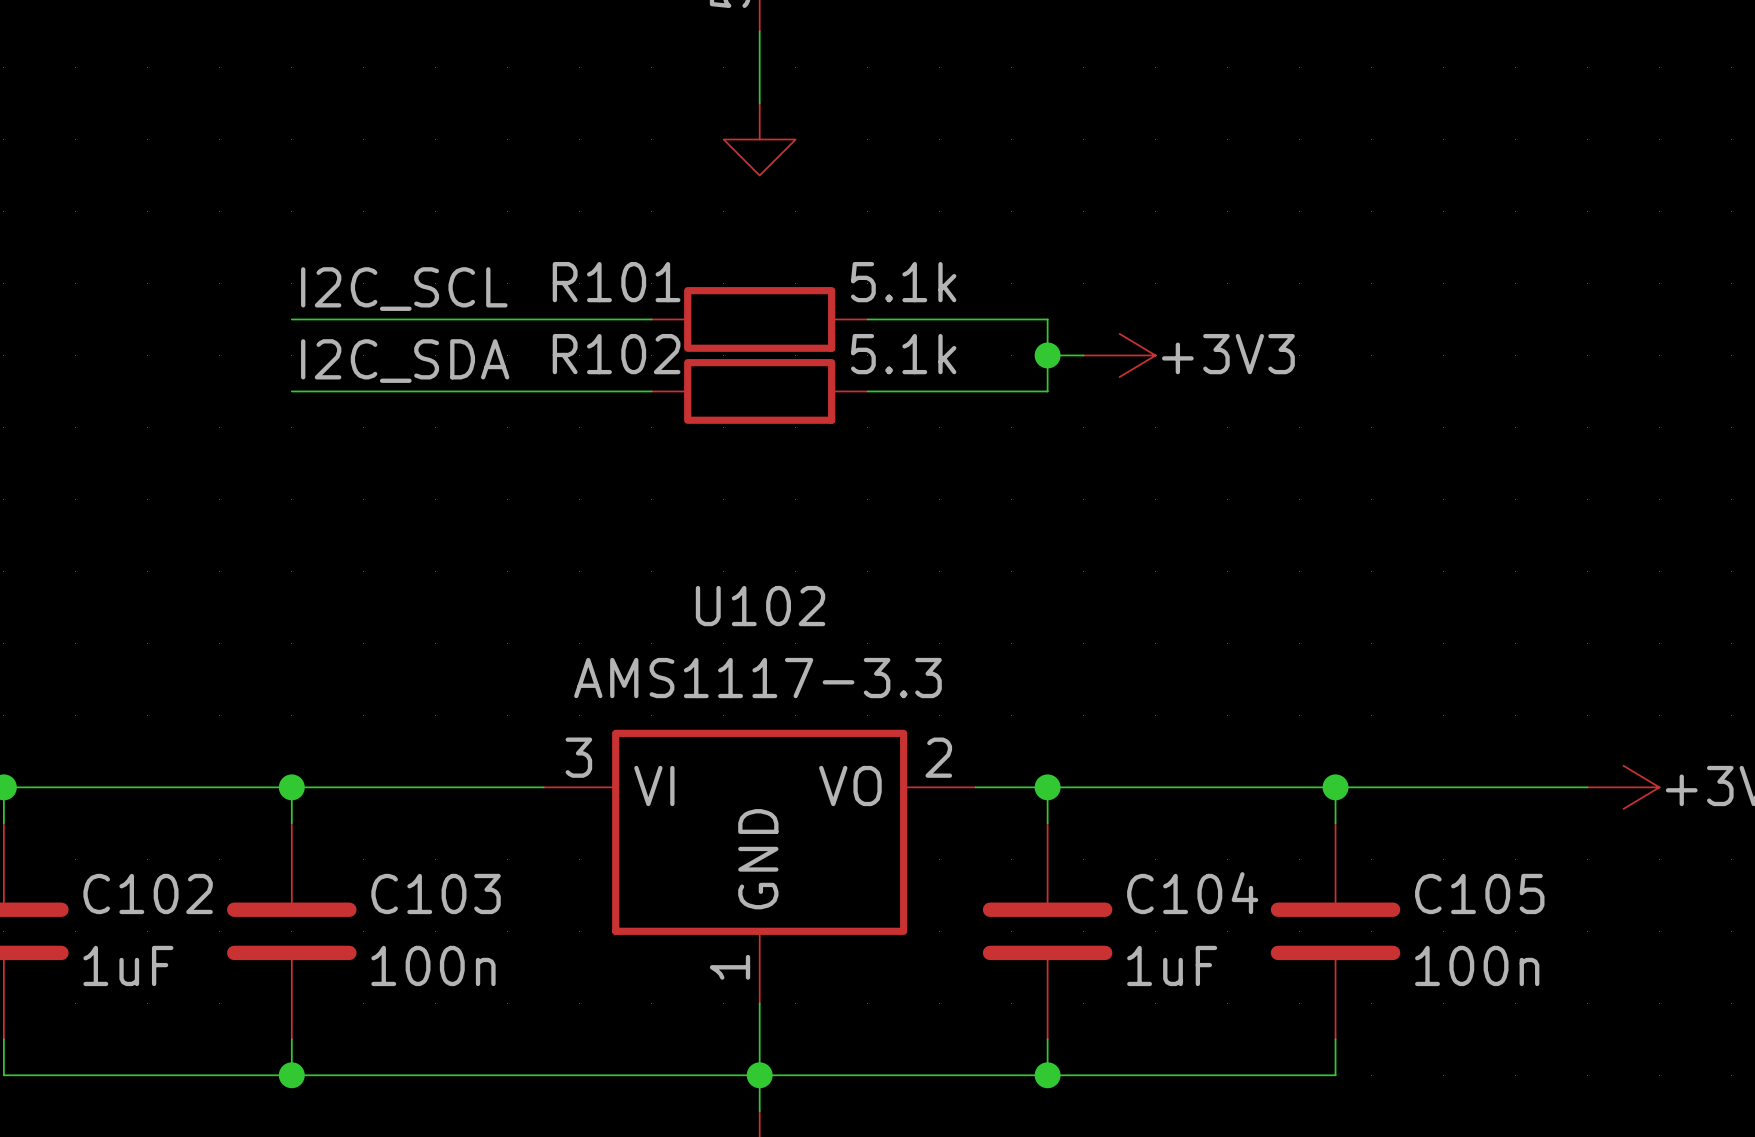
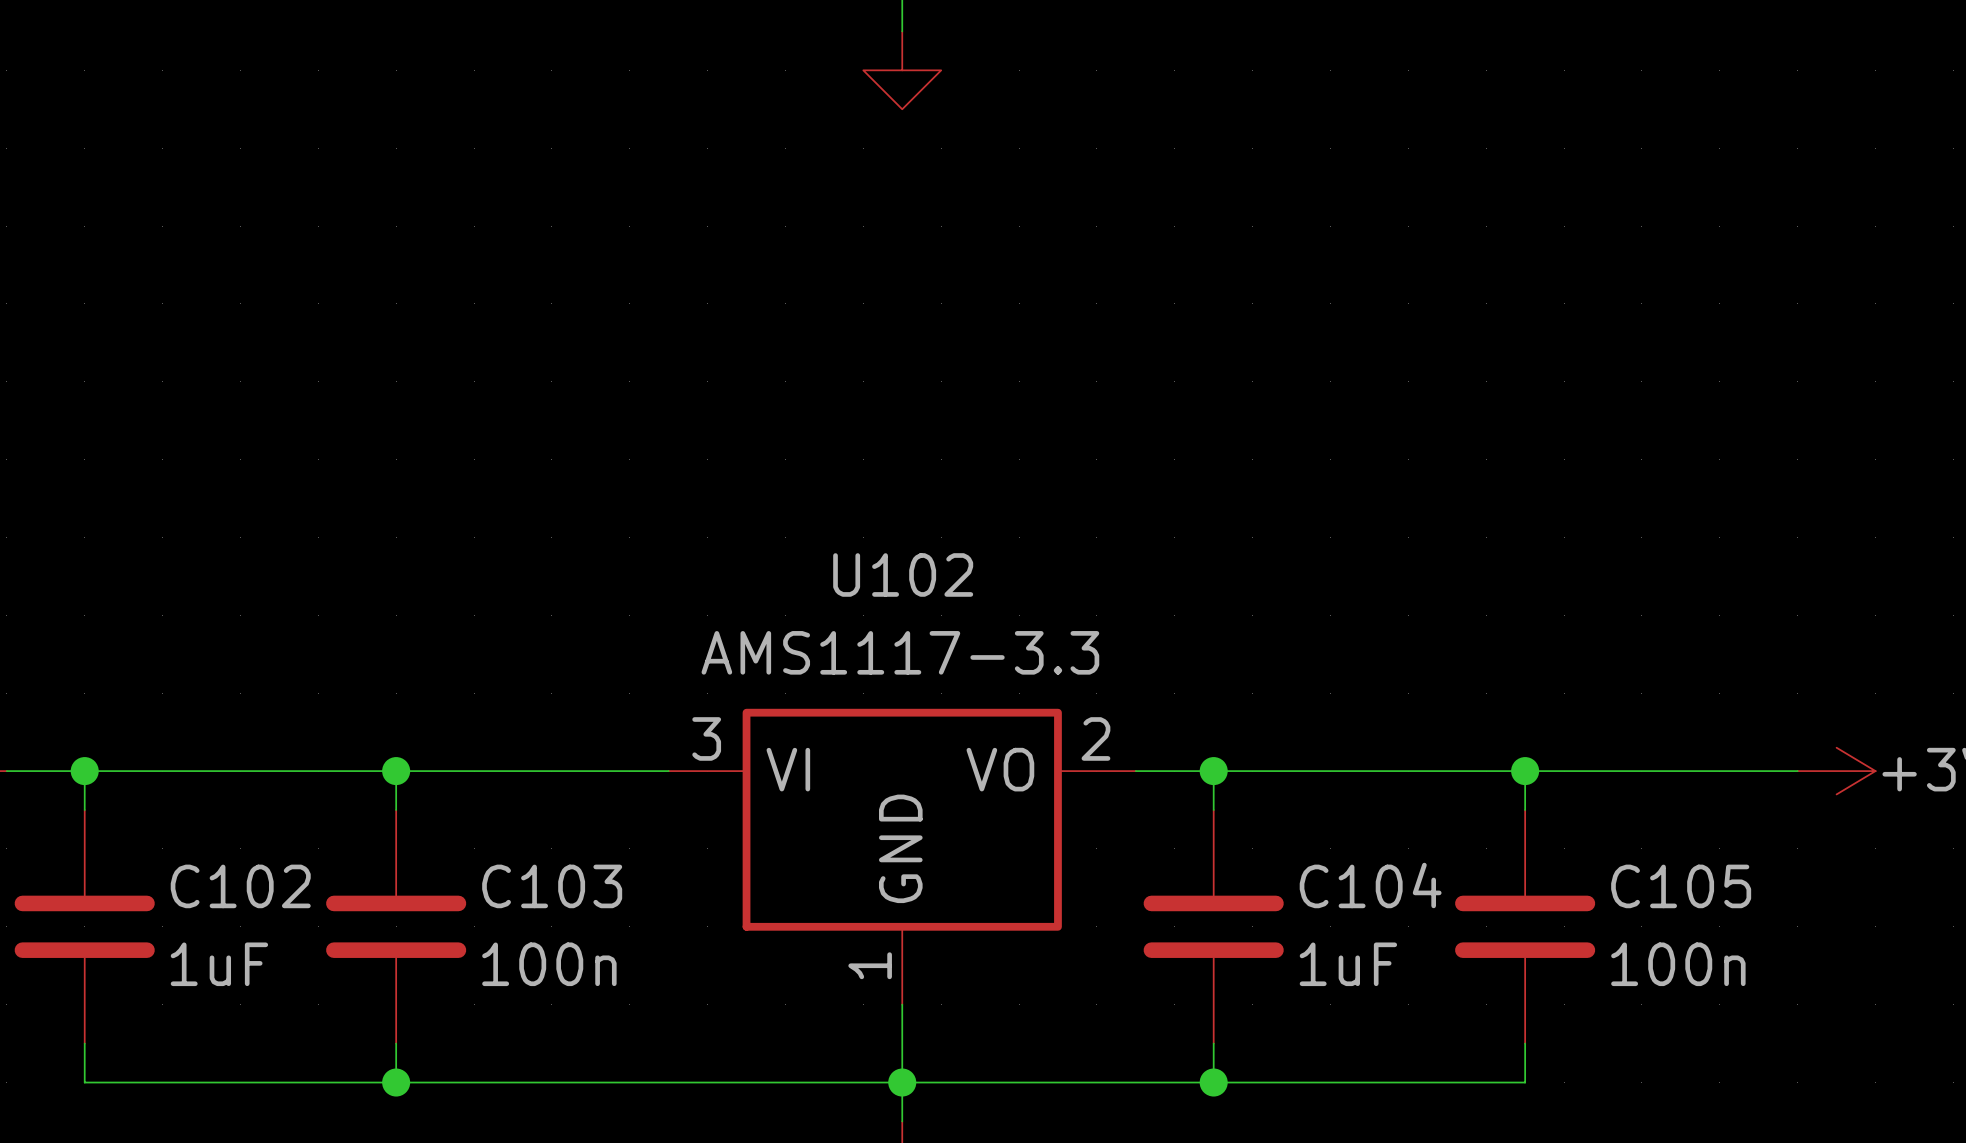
label: I2C_SCL (404, 289) -> none
wire: (291, 319) (651, 319) -> none
R101: 5.1k (759, 319) -> none
wire: (867, 319) (1047, 319) (1047, 391) (867, 391) -> none
wire: (1047, 355) (1083, 355) -> none
junction: (1047, 355) -> none
power symbol: +3V3 (1119, 355) -> none
label: I2C_SDA (405, 361) -> none
wire: (291, 391) (651, 391) -> none
R102: 5.1k (759, 391) -> none

